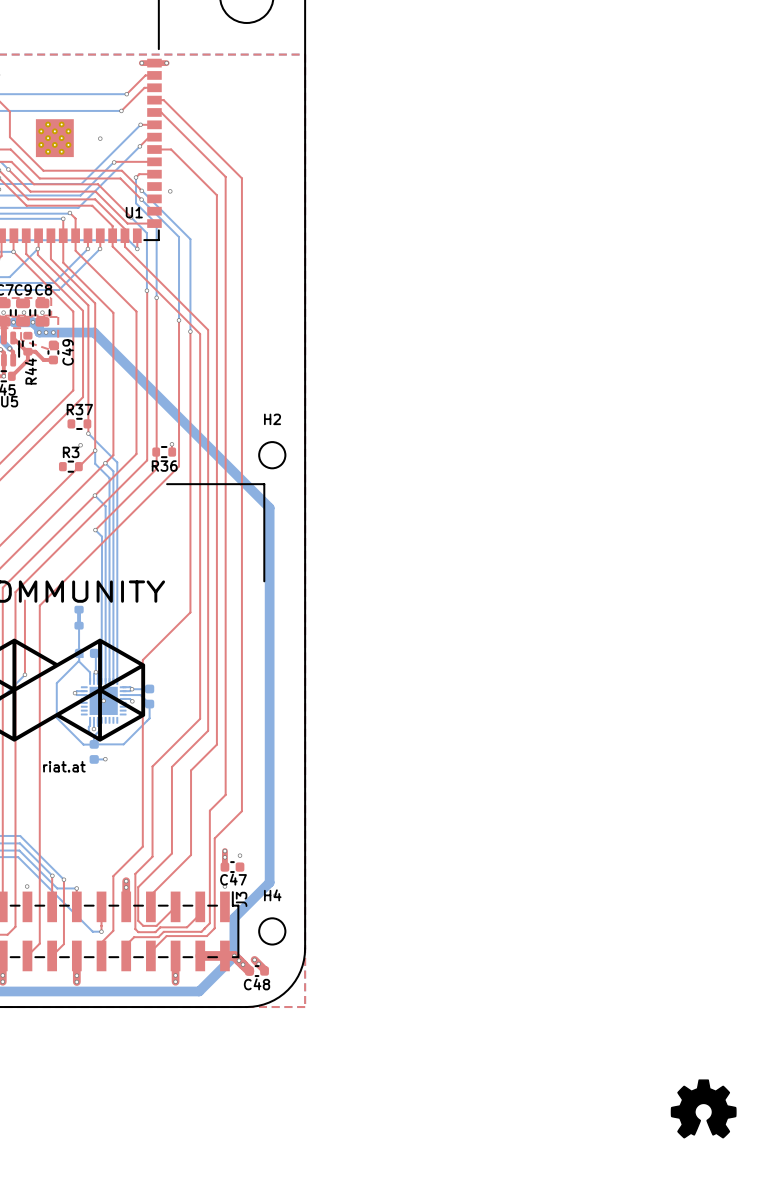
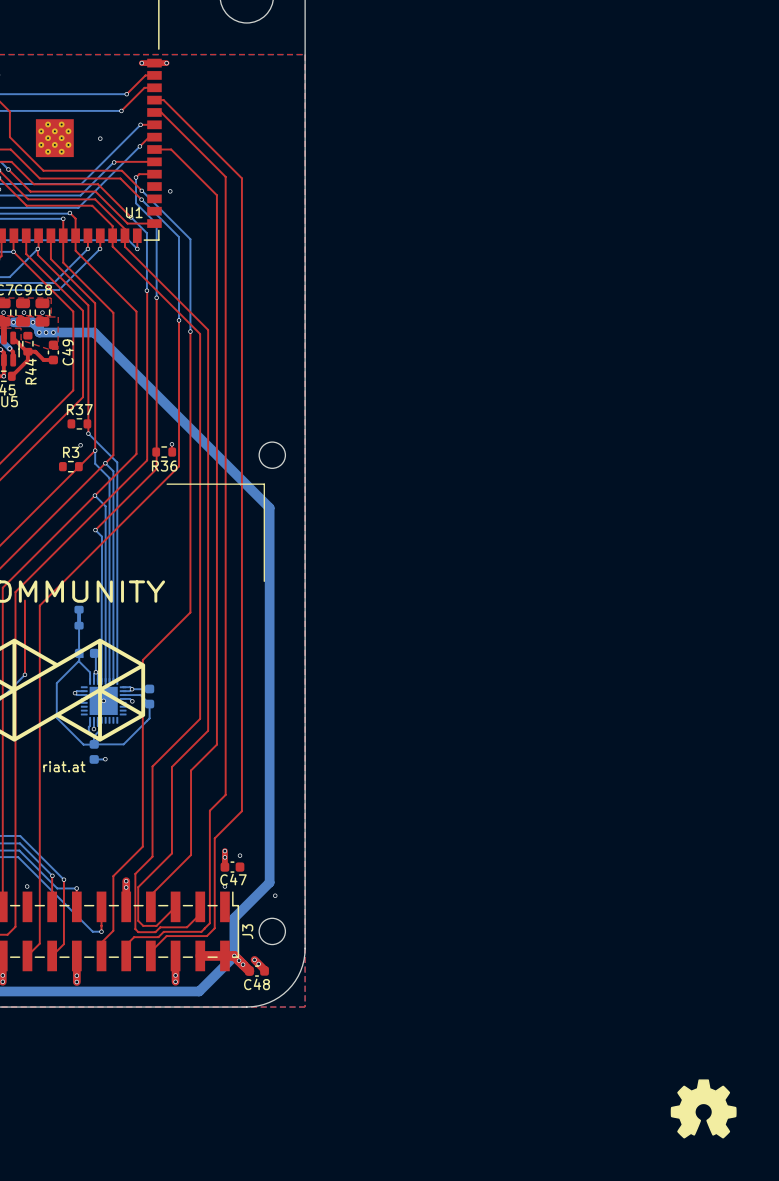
H2 name: H2 (272, 419) -> none
H4 name: H4 (272, 895) -> none
J3 name position: J3 (241, 899) -> J3 (247, 931)

